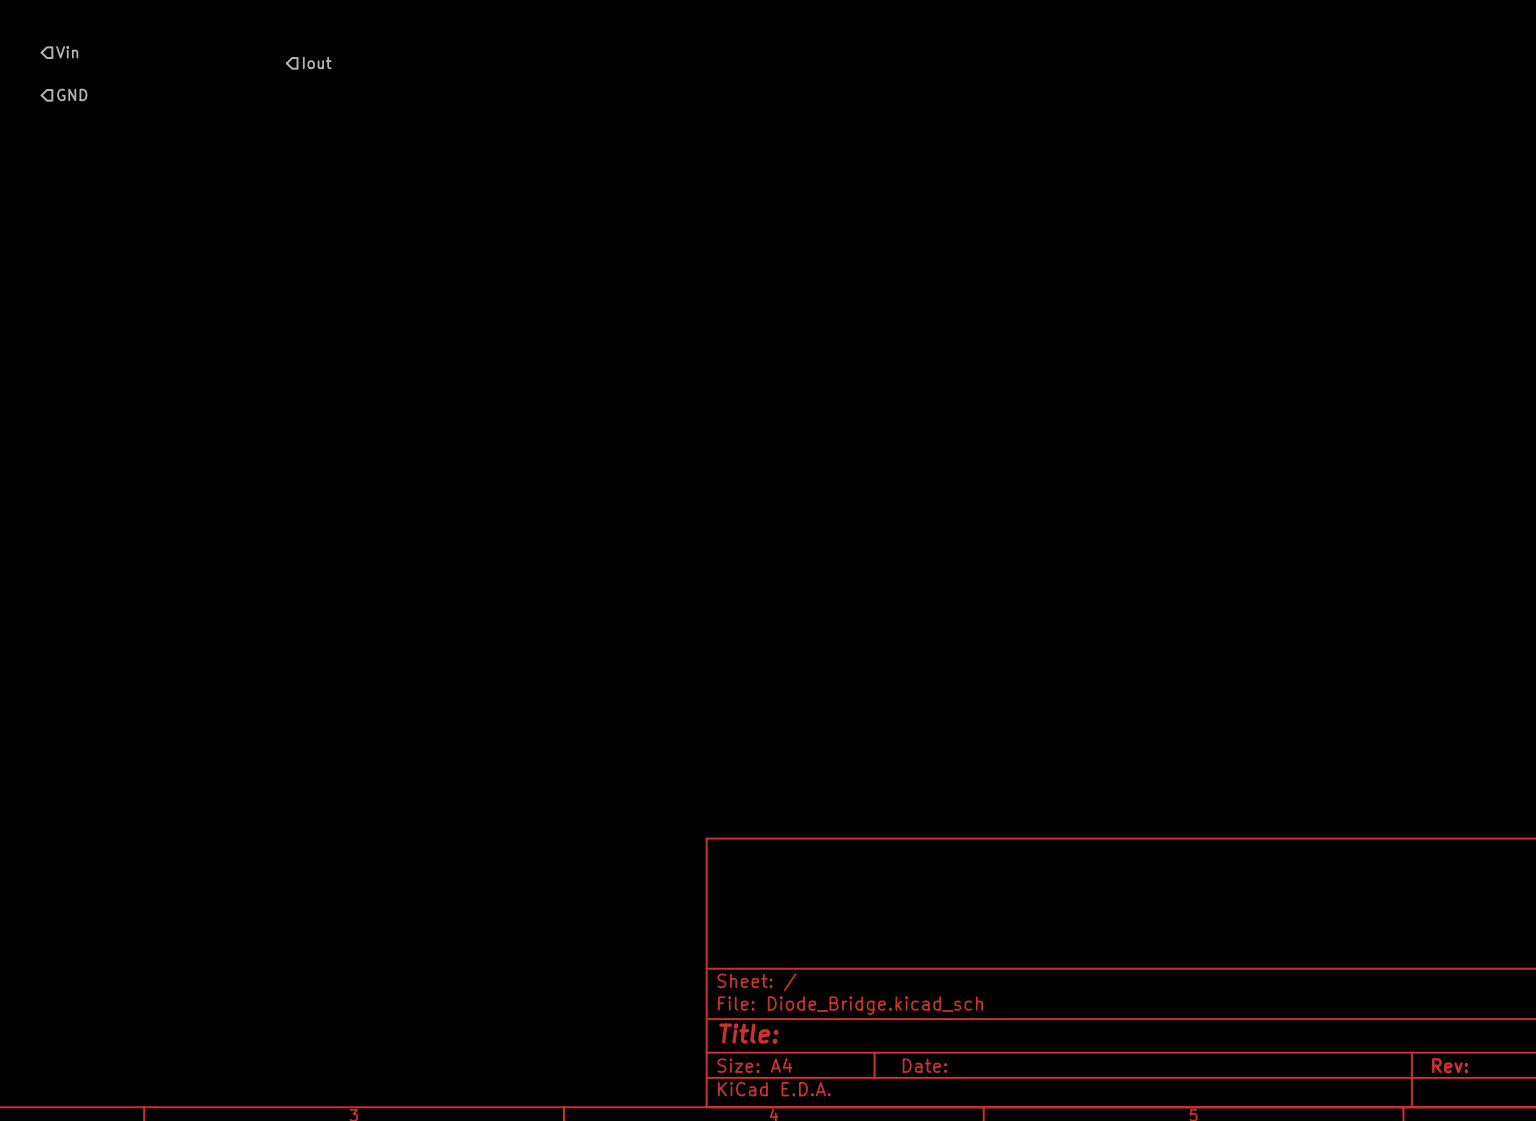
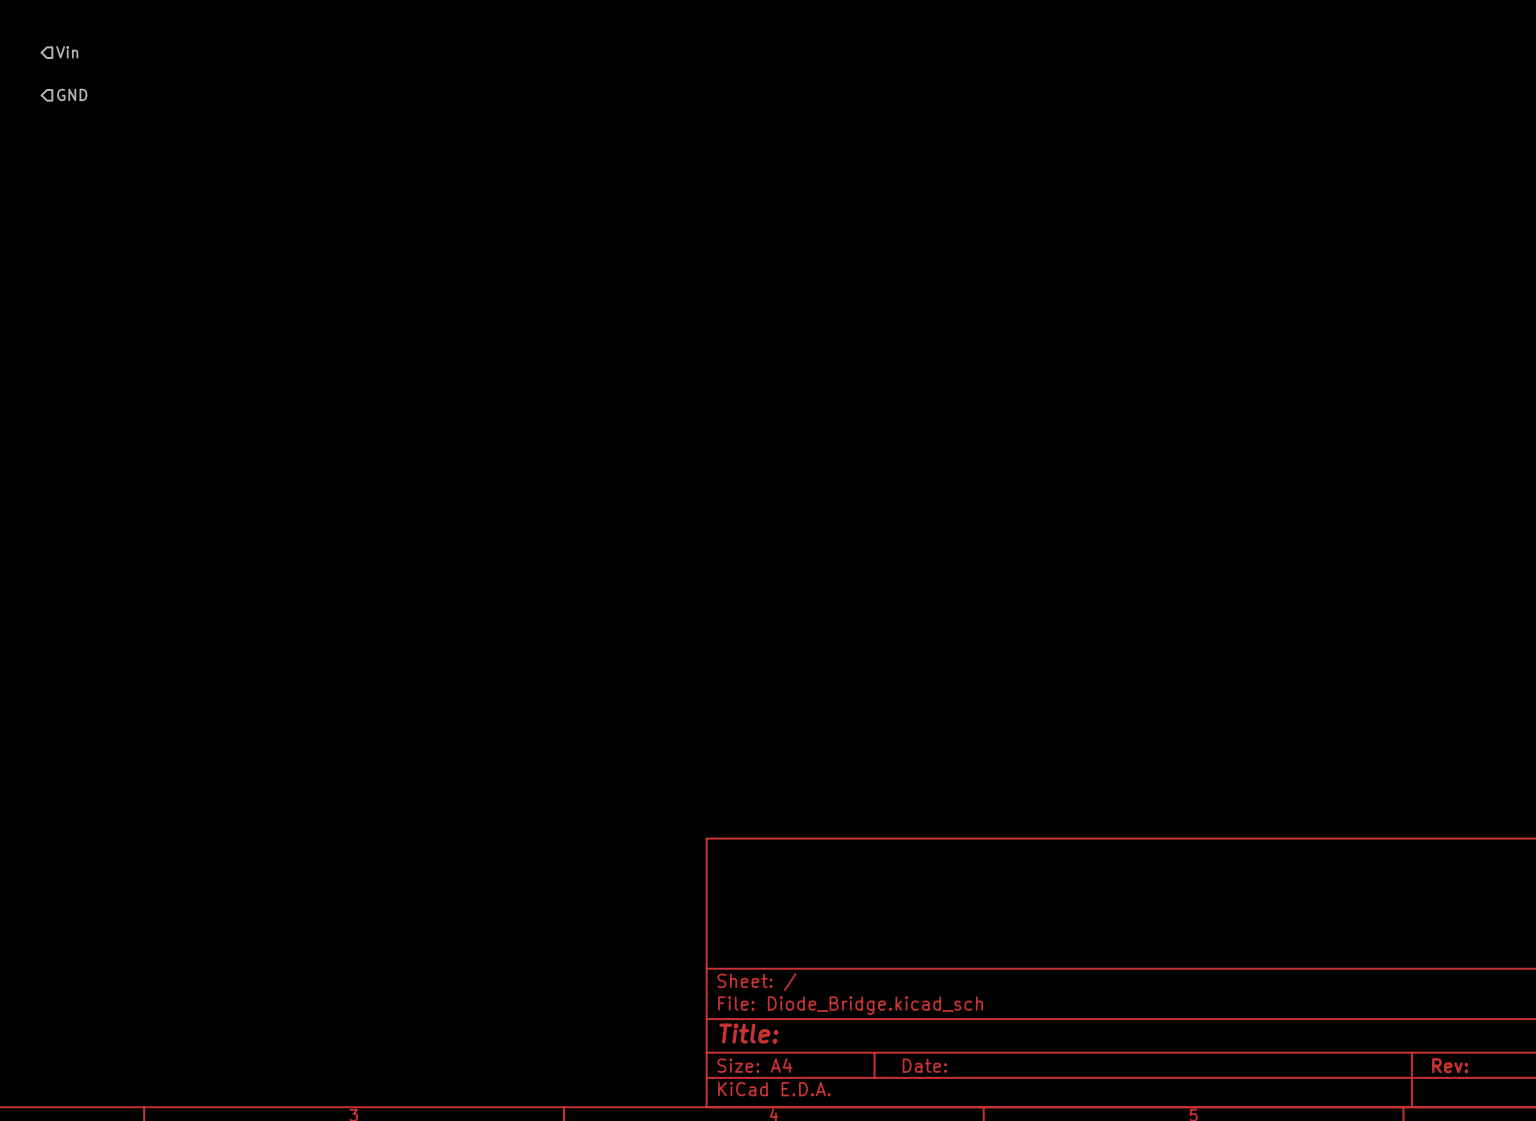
hierarchical label: Iout (317, 62) -> none

